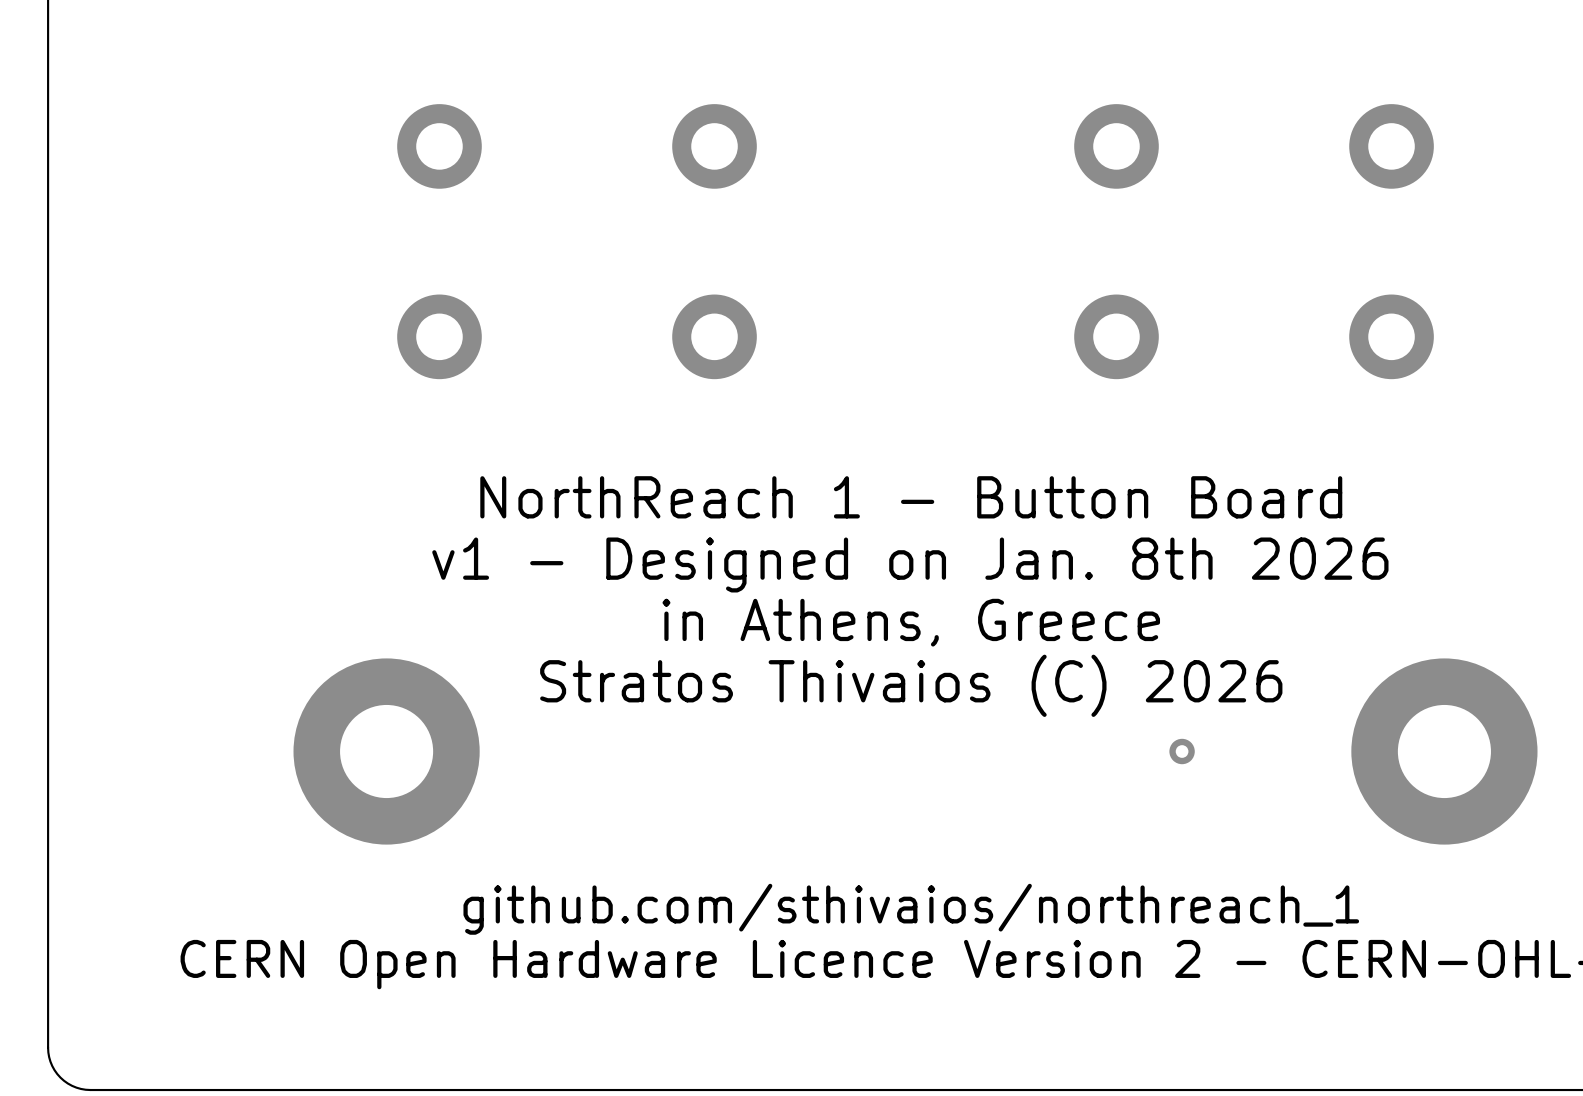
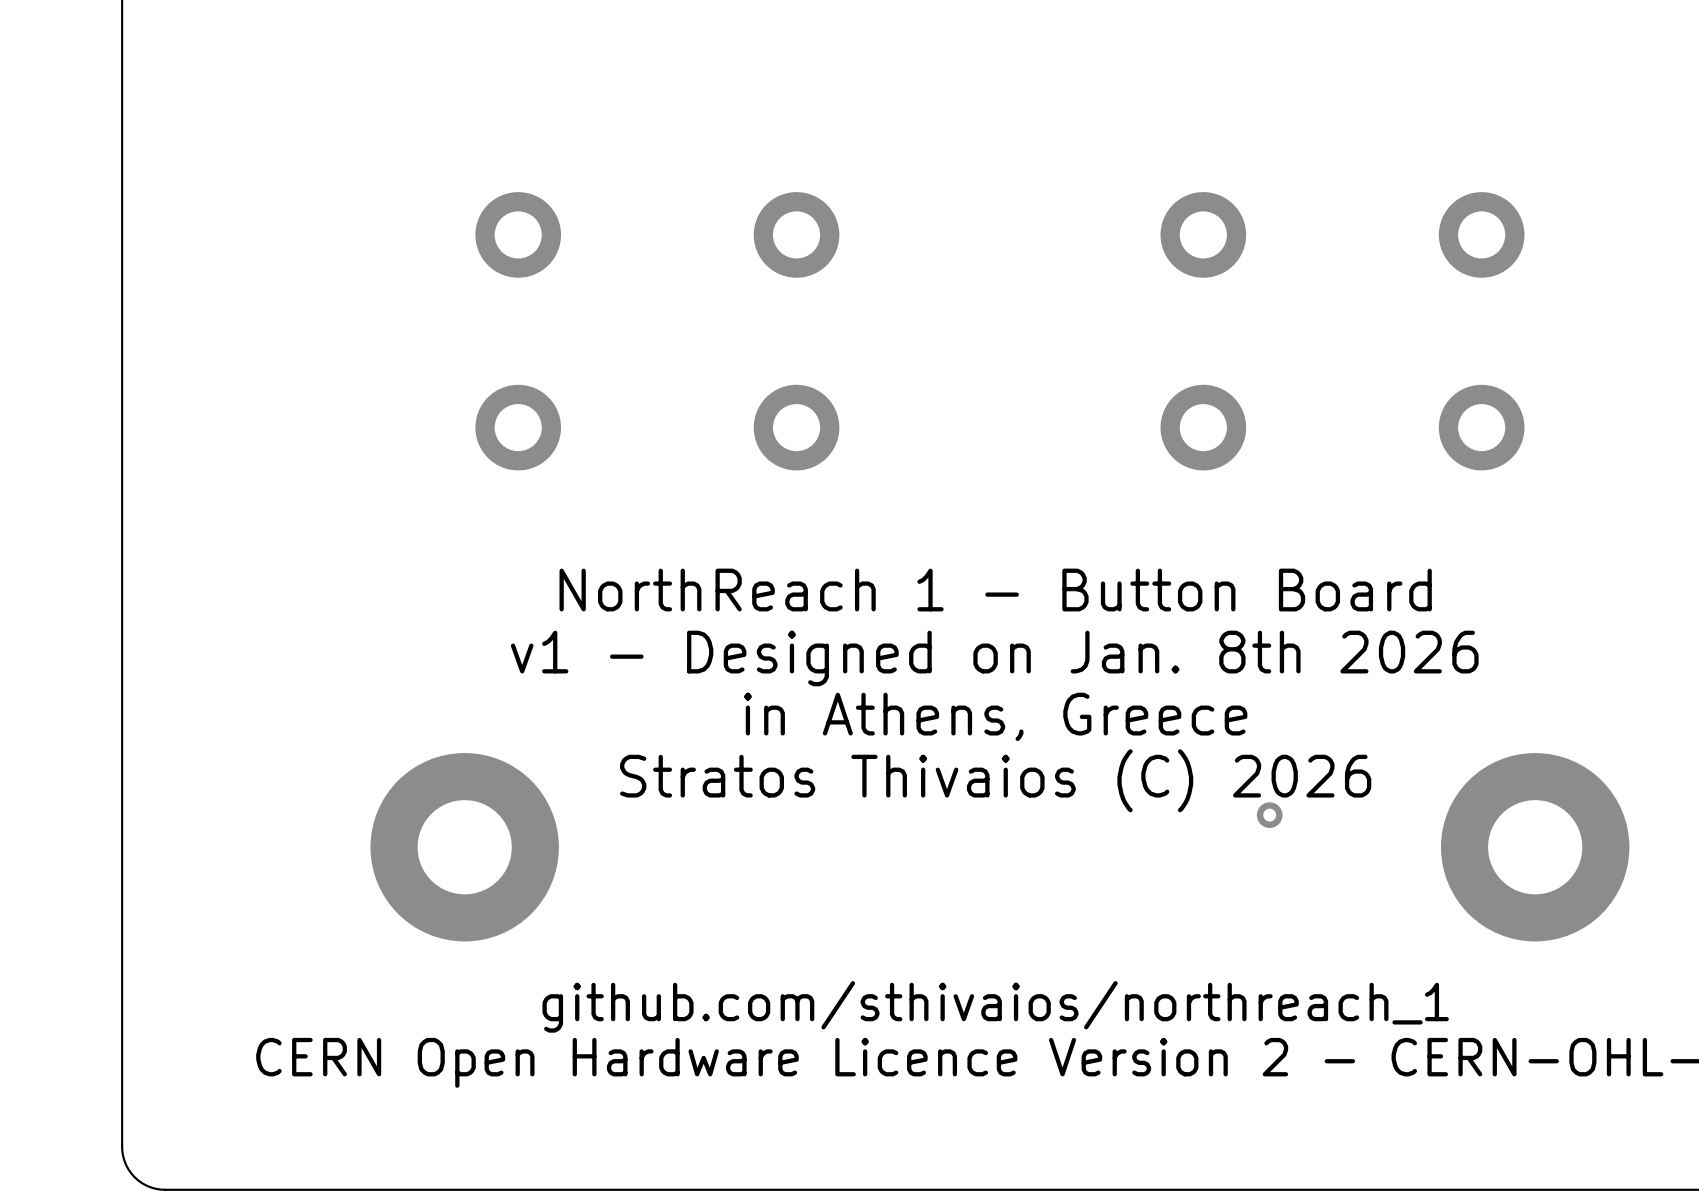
via position: (1182, 751) -> (1269, 815)

